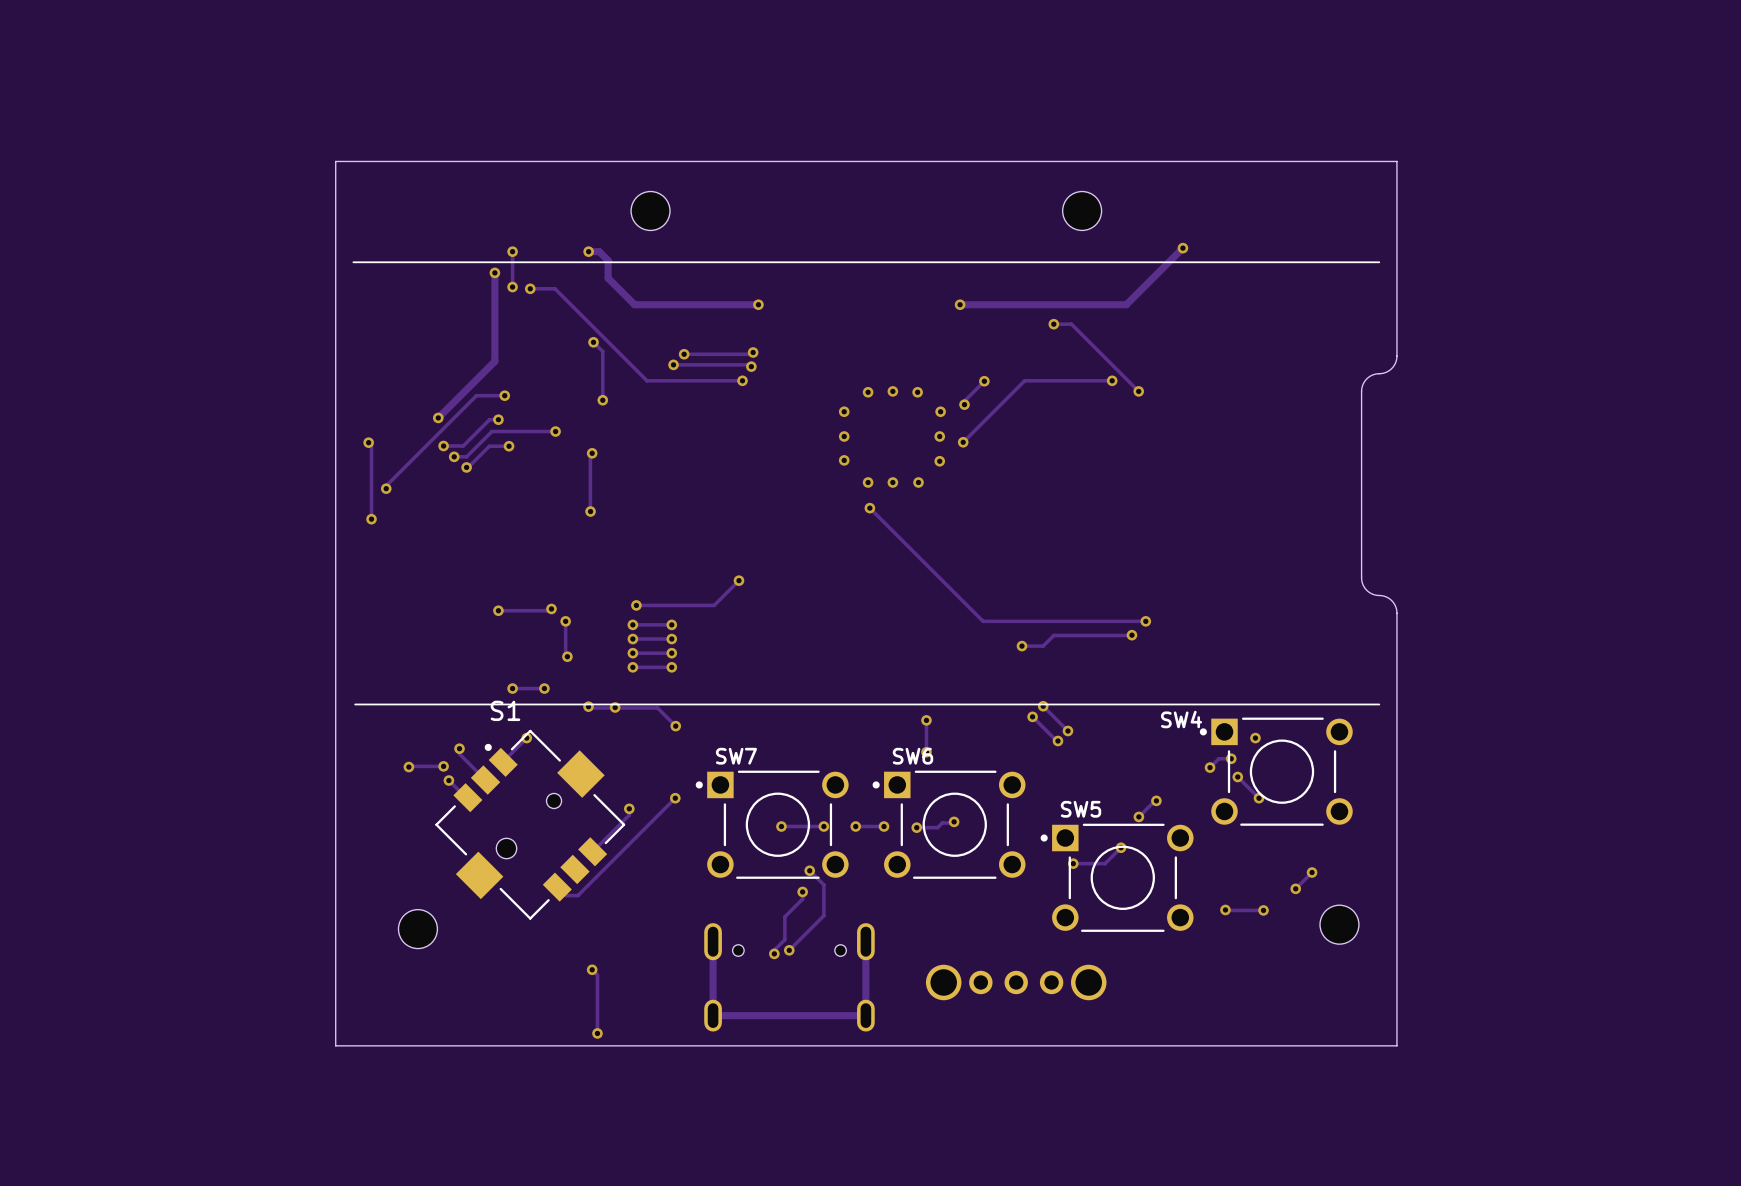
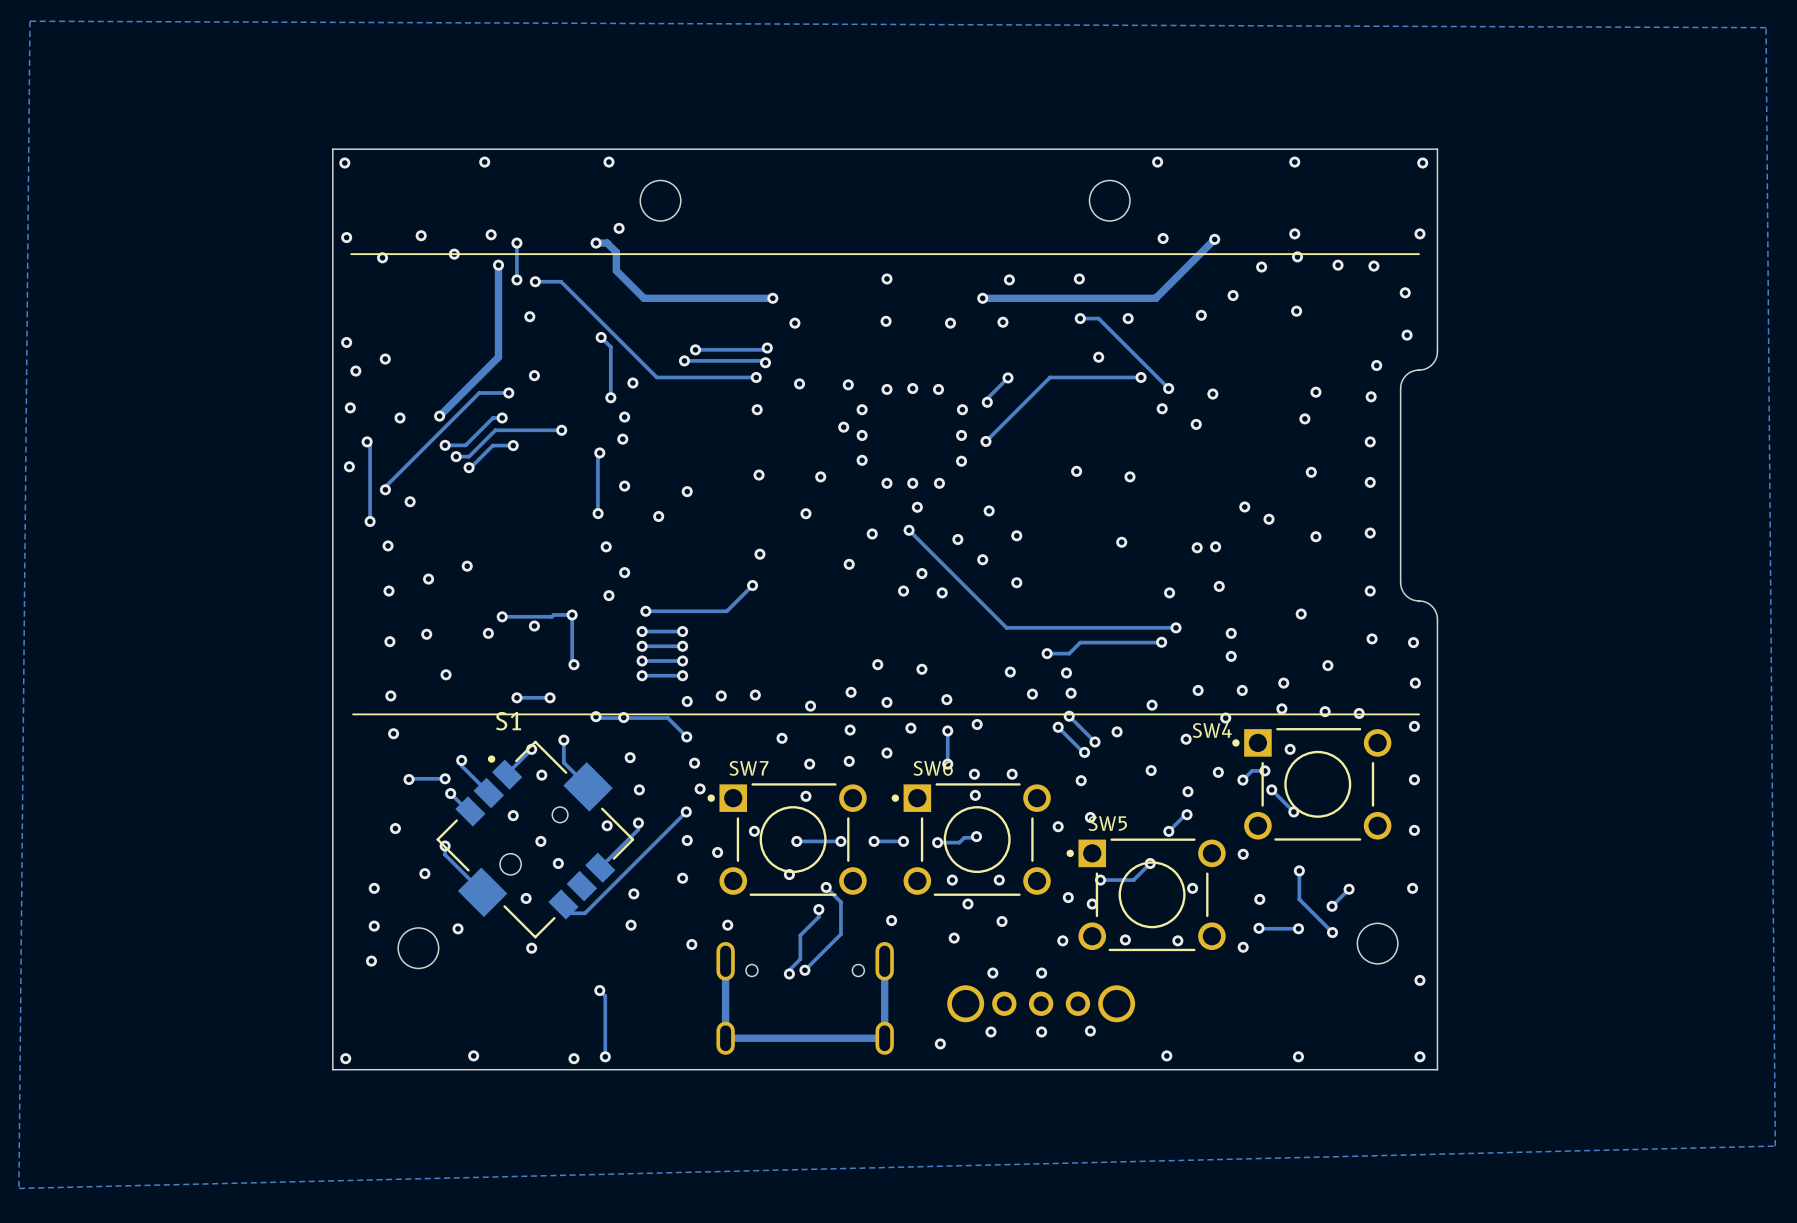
zone outline: none -> (29, 21) (1766, 27) (1775, 1146) (18, 1188) (29, 21)
via: none -> (484, 162)
via: none -> (608, 162)
via: none -> (1157, 162)
via: none -> (1294, 162)
via: none -> (344, 162)
via: none -> (1422, 162)
via: none -> (619, 228)
via: none -> (1294, 233)
via: none -> (1419, 233)
via: none -> (491, 234)
via: none -> (421, 235)
via: none -> (346, 237)
via: none -> (1163, 238)
via: none -> (454, 254)
via: none -> (1297, 256)
via: none -> (382, 257)
via: none -> (1338, 265)
via: none -> (1373, 266)
via: none -> (1261, 267)
via: none -> (886, 278)
via: none -> (1079, 278)
via: none -> (1009, 279)
via: none -> (1405, 292)
via: none -> (1233, 295)
via: none -> (1296, 311)
via: none -> (1201, 315)
via: none -> (529, 316)
via: none -> (1128, 318)
via: none -> (886, 321)
via: none -> (1002, 322)
via: none -> (794, 323)
via: none -> (950, 323)
via: none -> (1407, 335)
via: none -> (346, 342)
via: none -> (1098, 357)
via: none -> (385, 359)
via: none -> (1376, 365)
via: none -> (355, 371)
via: none -> (534, 375)
via: none -> (632, 383)
via: none -> (799, 383)
via: none -> (848, 384)
via: none -> (1315, 392)
via: none -> (1212, 394)
via: none -> (1371, 396)
via: none -> (350, 407)
via: none -> (1162, 408)
via: none -> (757, 409)
via: none -> (624, 417)
via: none -> (400, 417)
via: none -> (1304, 418)
via: none -> (1196, 424)
via: none -> (843, 427)
via: none -> (622, 439)
via: none -> (1370, 441)
via: none -> (349, 466)
via: none -> (1076, 471)
via: none -> (1311, 472)
via: none -> (759, 475)
via: none -> (820, 476)
via: none -> (1129, 476)
via: none -> (1370, 482)
via: none -> (624, 486)
via: none -> (687, 491)
via: none -> (410, 501)
via: none -> (917, 507)
via: none -> (1244, 506)
track: (869, 508) (889, 527) -> none
via: (869, 508) -> none
via: none -> (989, 510)
via: none -> (805, 513)
via: none -> (658, 516)
via: none -> (1268, 519)
via: none -> (909, 530)
via: none -> (1370, 533)
via: none -> (872, 533)
via: none -> (1016, 535)
via: none -> (1315, 536)
via: none -> (957, 539)
via: none -> (1121, 542)
via: none -> (388, 545)
via: none -> (606, 546)
via: none -> (1215, 546)
via: none -> (1197, 547)
via: none -> (759, 554)
via: none -> (982, 559)
via: none -> (849, 564)
via: none -> (467, 566)
via: none -> (624, 572)
via: none -> (921, 573)
via: none -> (428, 579)
via: none -> (1016, 582)
via: none -> (1219, 586)
via: none -> (388, 591)
via: none -> (903, 591)
via: none -> (1370, 591)
via: none -> (942, 592)
via: none -> (1169, 592)
via: none -> (608, 595)
track: none -> (557, 614) (572, 614) (572, 627)
via: (551, 608) -> none
via: none -> (572, 614)
via: none -> (1301, 614)
via: none -> (534, 626)
via: (565, 621) -> none
via: none -> (488, 633)
via: none -> (1231, 633)
via: none -> (426, 634)
via: none -> (1372, 638)
via: none -> (389, 641)
via: none -> (1413, 642)
via: none -> (1231, 656)
via: none -> (877, 664)
via: none -> (1327, 665)
via: none -> (921, 669)
via: none -> (1010, 672)
via: none -> (1066, 672)
via: none -> (446, 674)
via: none -> (1283, 683)
via: none -> (1415, 683)
via: none -> (1198, 690)
via: none -> (1242, 690)
via: none -> (851, 692)
via: none -> (1071, 693)
via: none -> (755, 695)
via: none -> (1032, 694)
via: none -> (390, 695)
via: none -> (721, 695)
via: none -> (946, 699)
via: none -> (687, 701)
via: none -> (886, 702)
via: none -> (1152, 705)
via: none -> (810, 706)
via: none -> (1281, 708)
via: none -> (1325, 711)
via: none -> (1359, 713)
via: none -> (1225, 718)
via: none -> (977, 724)
via: none -> (1414, 726)
via: none -> (910, 728)
via: none -> (850, 730)
via: none -> (1117, 731)
via: none -> (393, 733)
via: none -> (782, 738)
via: none -> (1186, 739)
track: none -> (563, 740) (563, 762) (588, 786)
via: none -> (563, 740)
via: none -> (886, 753)
via: none -> (630, 757)
via: none -> (849, 761)
via: none -> (694, 763)
via: none -> (809, 764)
via: none -> (1151, 770)
via: none -> (1218, 772)
via: none -> (974, 774)
via: none -> (1012, 774)
via: none -> (541, 775)
via: none -> (1414, 779)
via: none -> (1081, 780)
via: none -> (639, 789)
via: none -> (700, 788)
via: none -> (1187, 791)
via: none -> (975, 795)
via: none -> (805, 796)
via: none -> (513, 815)
via: none -> (1090, 817)
via: none -> (607, 825)
via: none -> (1058, 826)
via: none -> (395, 828)
via: none -> (1414, 830)
via: none -> (754, 831)
via: none -> (687, 840)
via: none -> (540, 841)
track: none -> (445, 846) (445, 854) (482, 892)
via: none -> (445, 846)
via: none -> (717, 852)
via: none -> (1243, 854)
via: none -> (558, 863)
track: none -> (1299, 870) (1299, 899) (1332, 932)
via: none -> (1299, 870)
via: none -> (424, 873)
via: none -> (789, 874)
via: none -> (682, 878)
via: none -> (952, 880)
via: none -> (999, 880)
via: none -> (374, 888)
via: none -> (1192, 888)
via: none -> (1412, 888)
via: none -> (633, 893)
via: none -> (1068, 897)
via: none -> (526, 898)
via: none -> (1259, 899)
via: none -> (967, 904)
via: none -> (1092, 904)
via: none -> (891, 920)
via: none -> (1002, 921)
via: none -> (631, 925)
via: none -> (727, 925)
via: none -> (374, 926)
via: none -> (458, 928)
via: none -> (1332, 932)
via: none -> (954, 938)
via: none -> (1125, 939)
via: none -> (1062, 940)
via: none -> (1177, 940)
via: none -> (691, 944)
via: none -> (1243, 947)
via: none -> (531, 948)
via: none -> (371, 961)
via: none -> (992, 973)
via: none -> (1041, 973)
via: none -> (1419, 980)
via: none -> (1090, 1031)
via: none -> (990, 1031)
via: none -> (1041, 1031)
via: none -> (940, 1043)
via: none -> (473, 1055)
via: none -> (1166, 1055)
via: none -> (1298, 1056)
via: none -> (1419, 1056)
via: none -> (345, 1058)
via: none -> (574, 1058)

